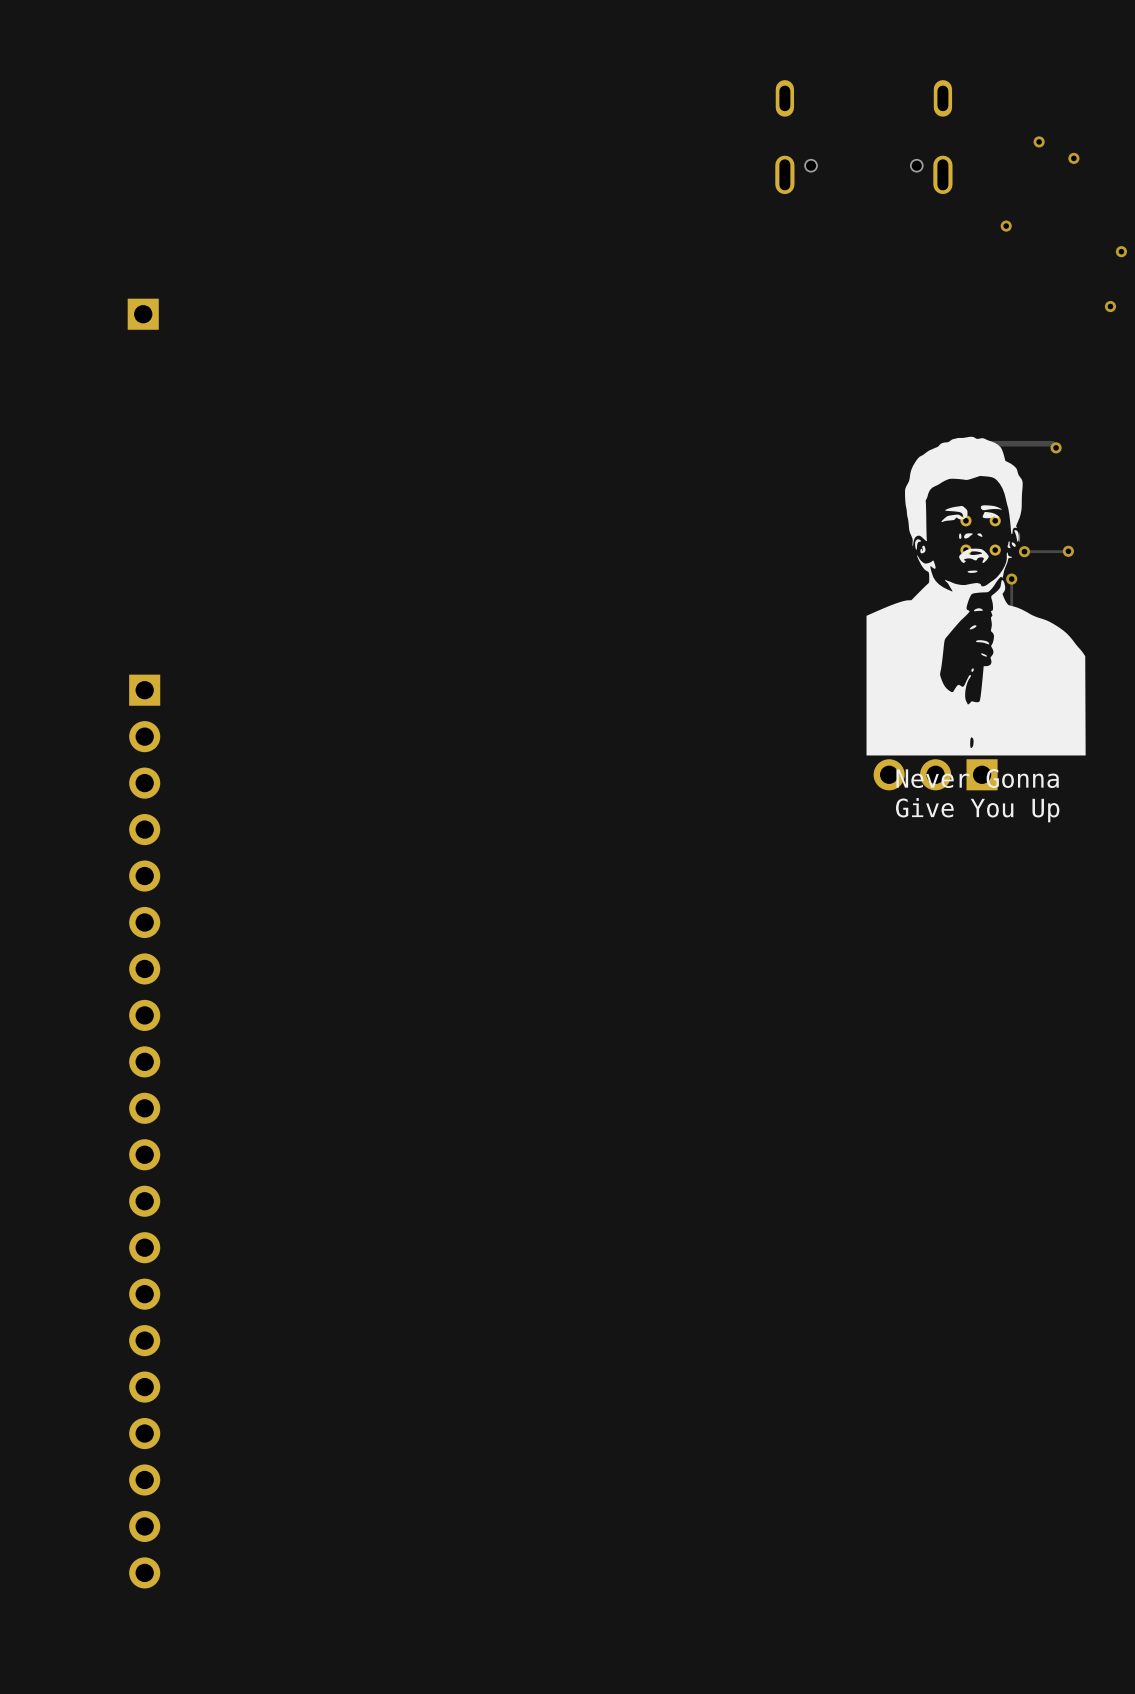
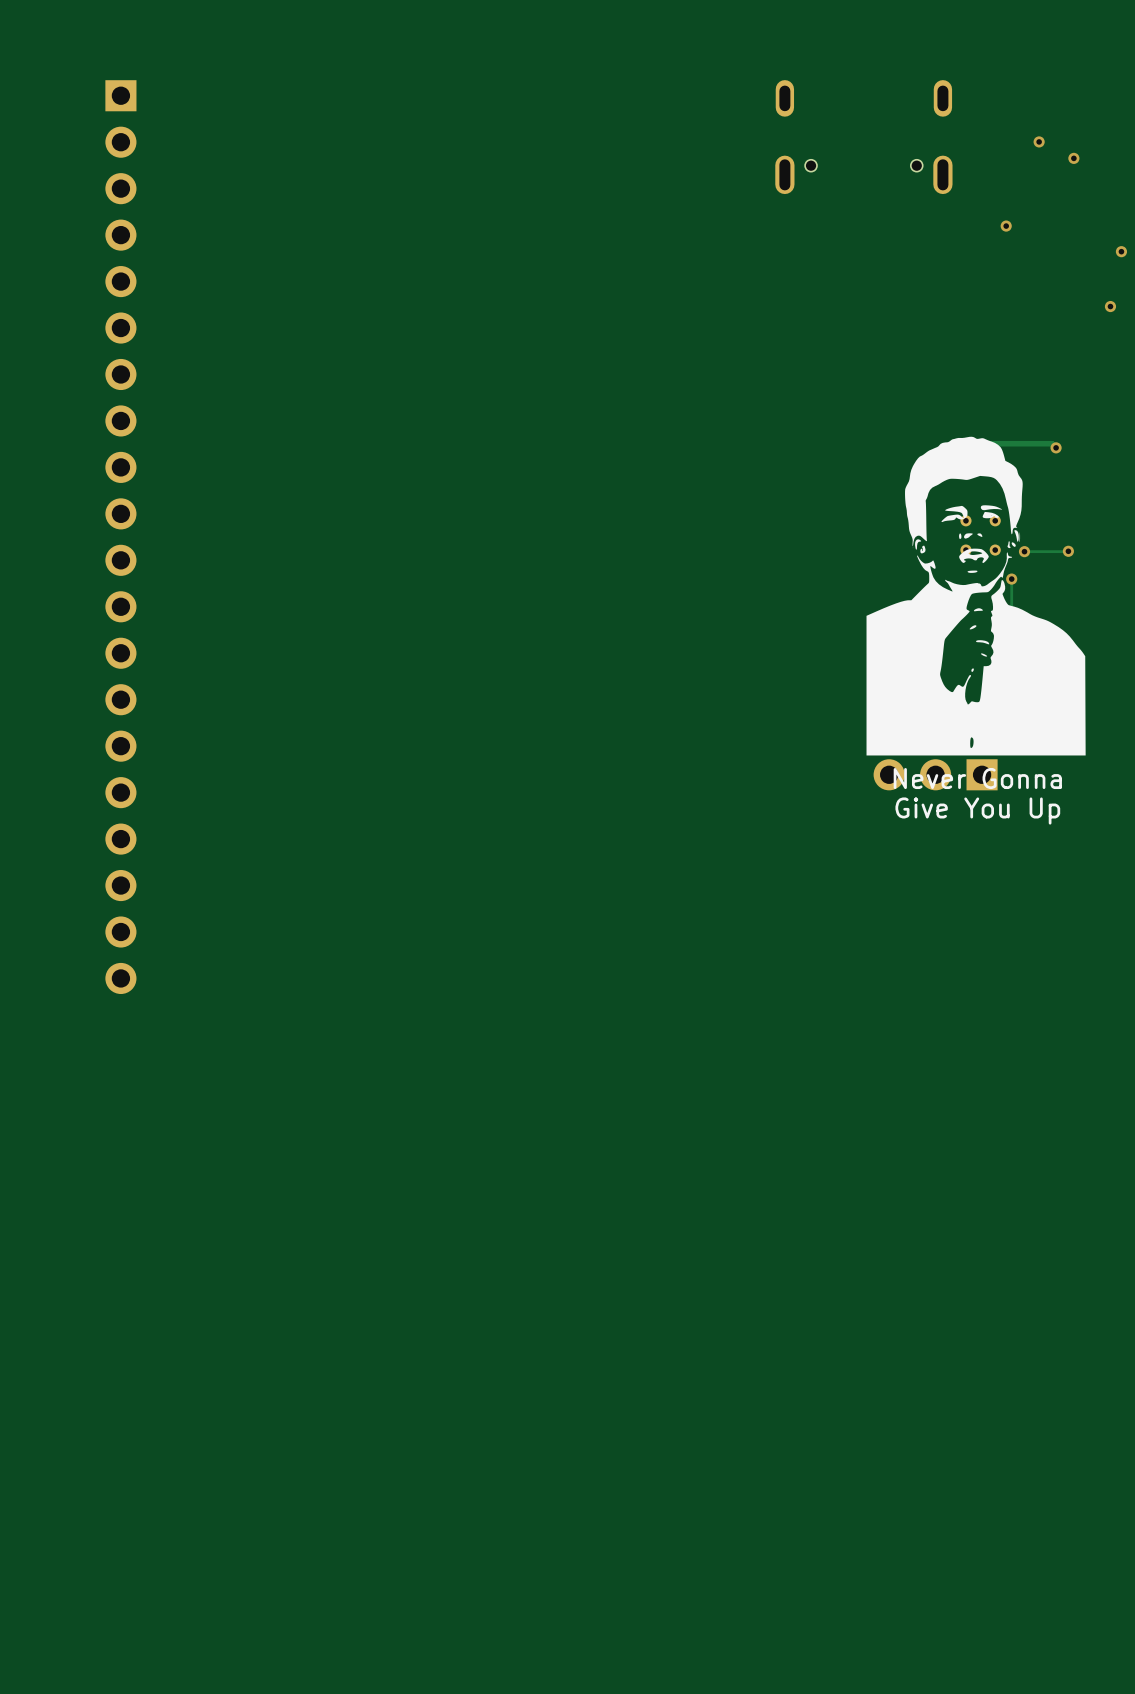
part: (143, 314) -> none
part: none -> (120, 537)
part: (144, 1131) -> none

